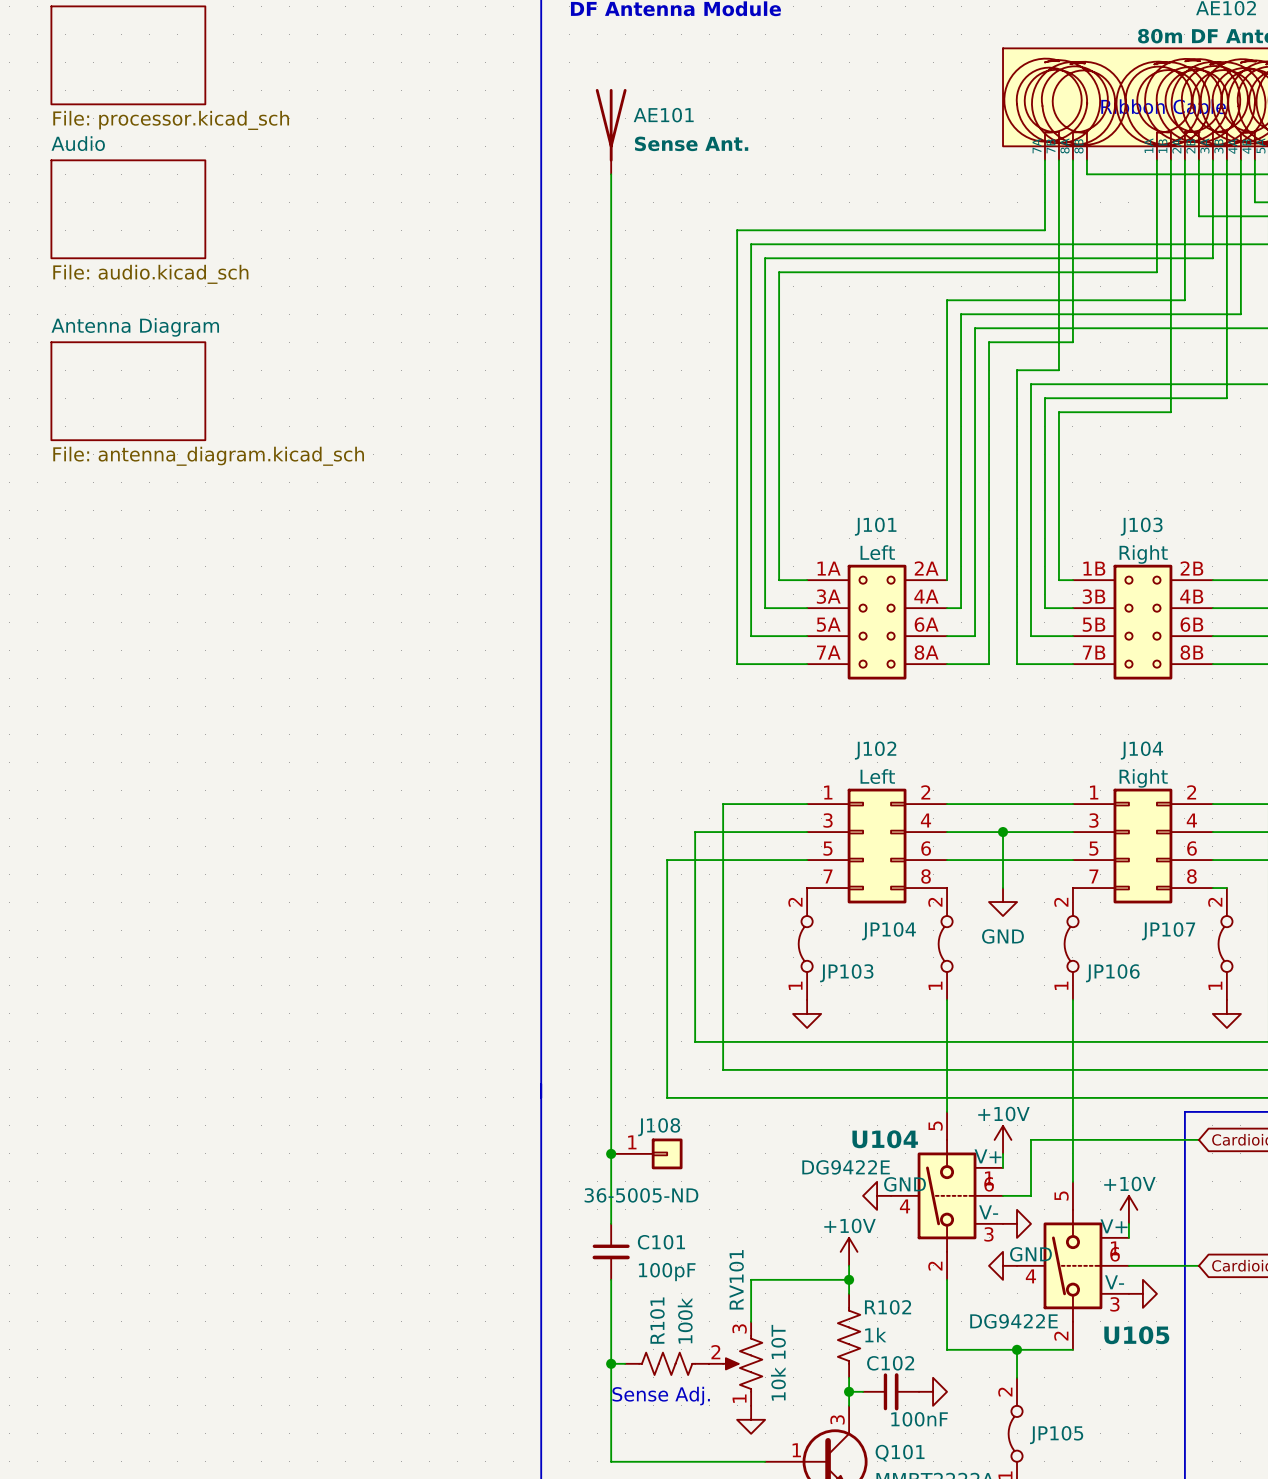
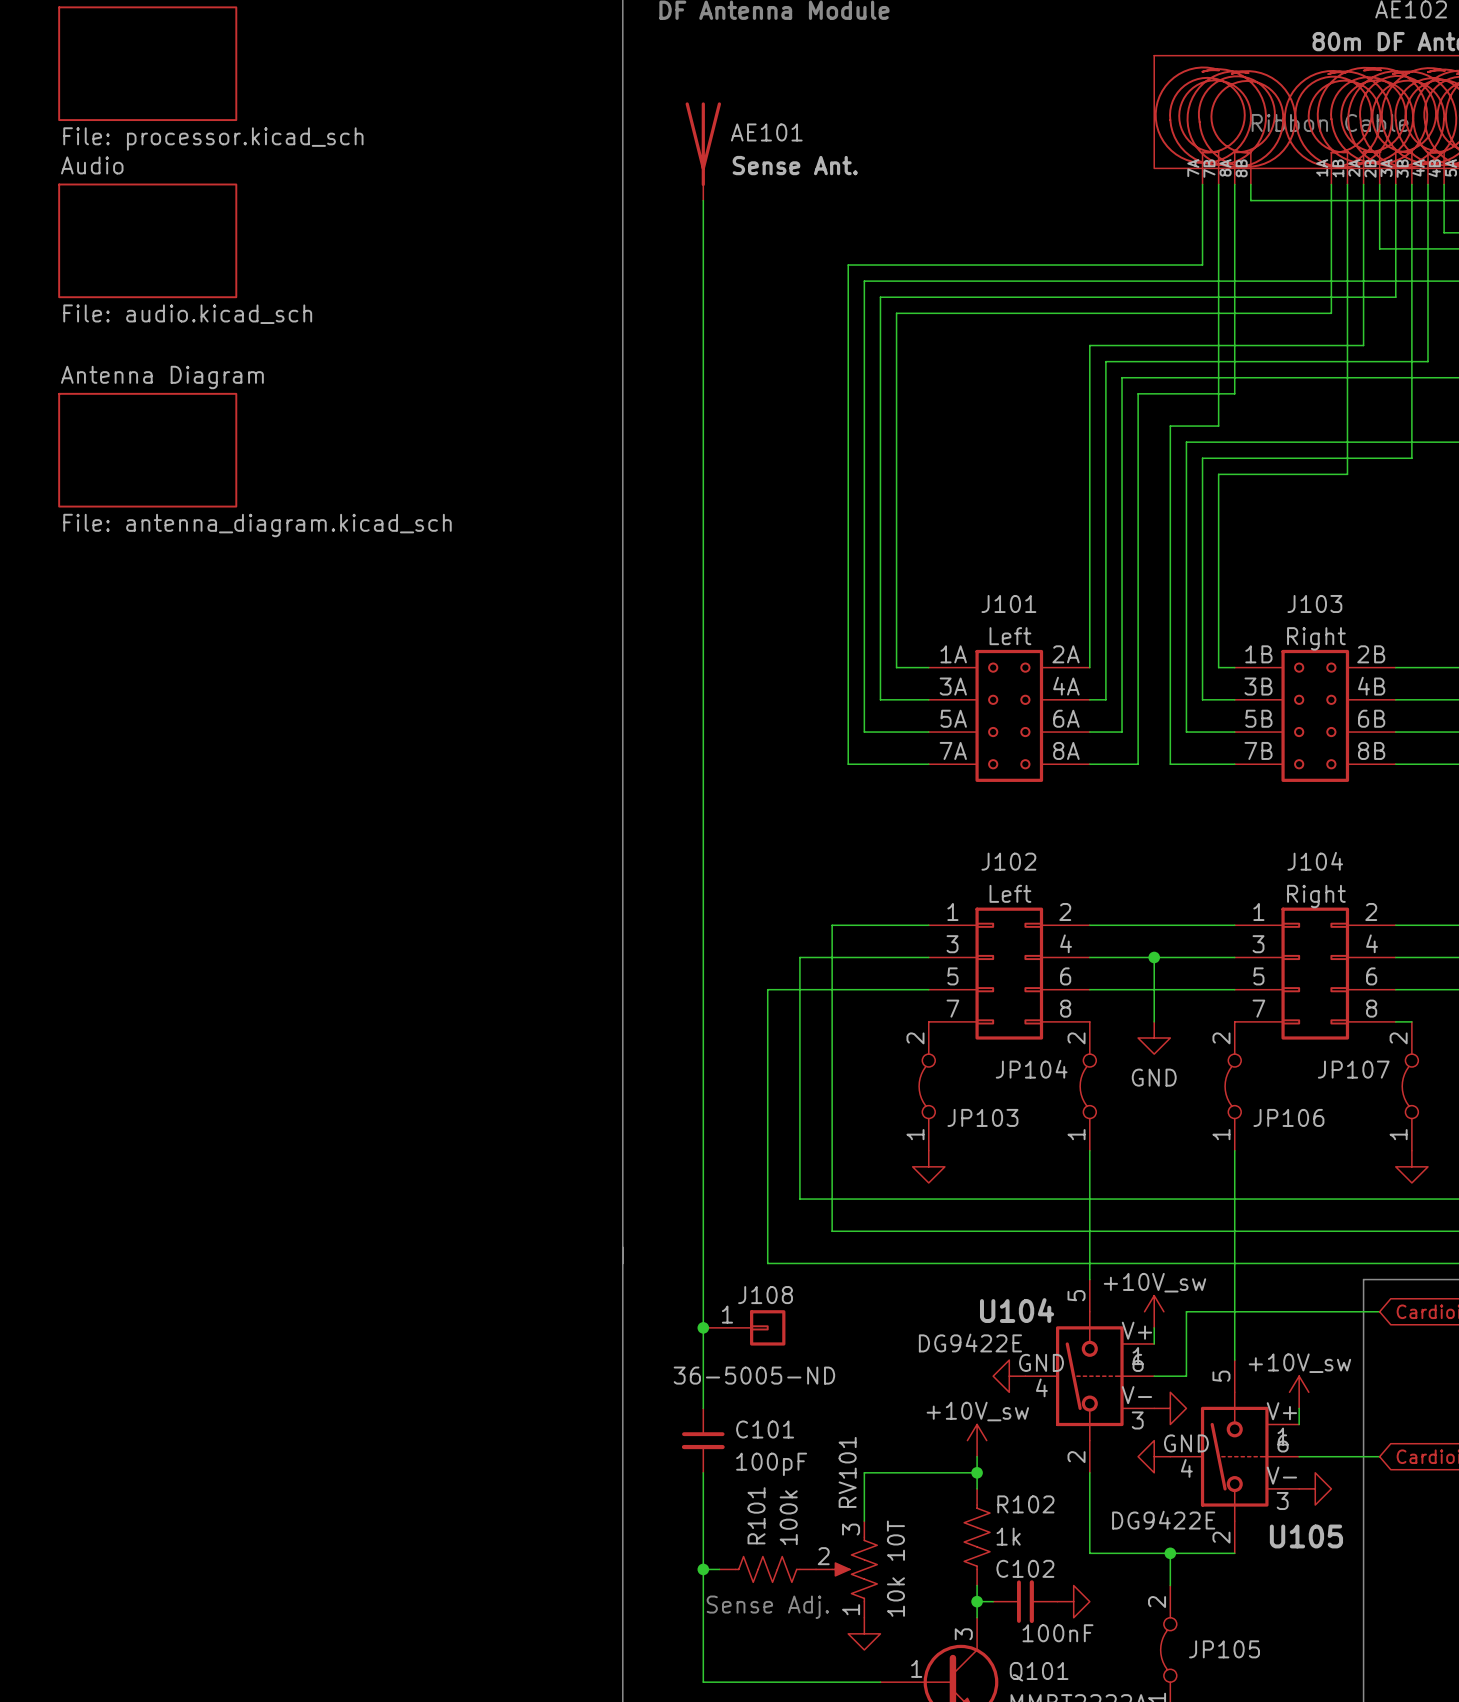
power symbol: +10V (1003, 1139) -> +10V_sw (1154, 1311)
power symbol: +10V (1128, 1209) -> +10V_sw (1299, 1392)
power symbol: +10V (849, 1251) -> +10V_sw (977, 1440)

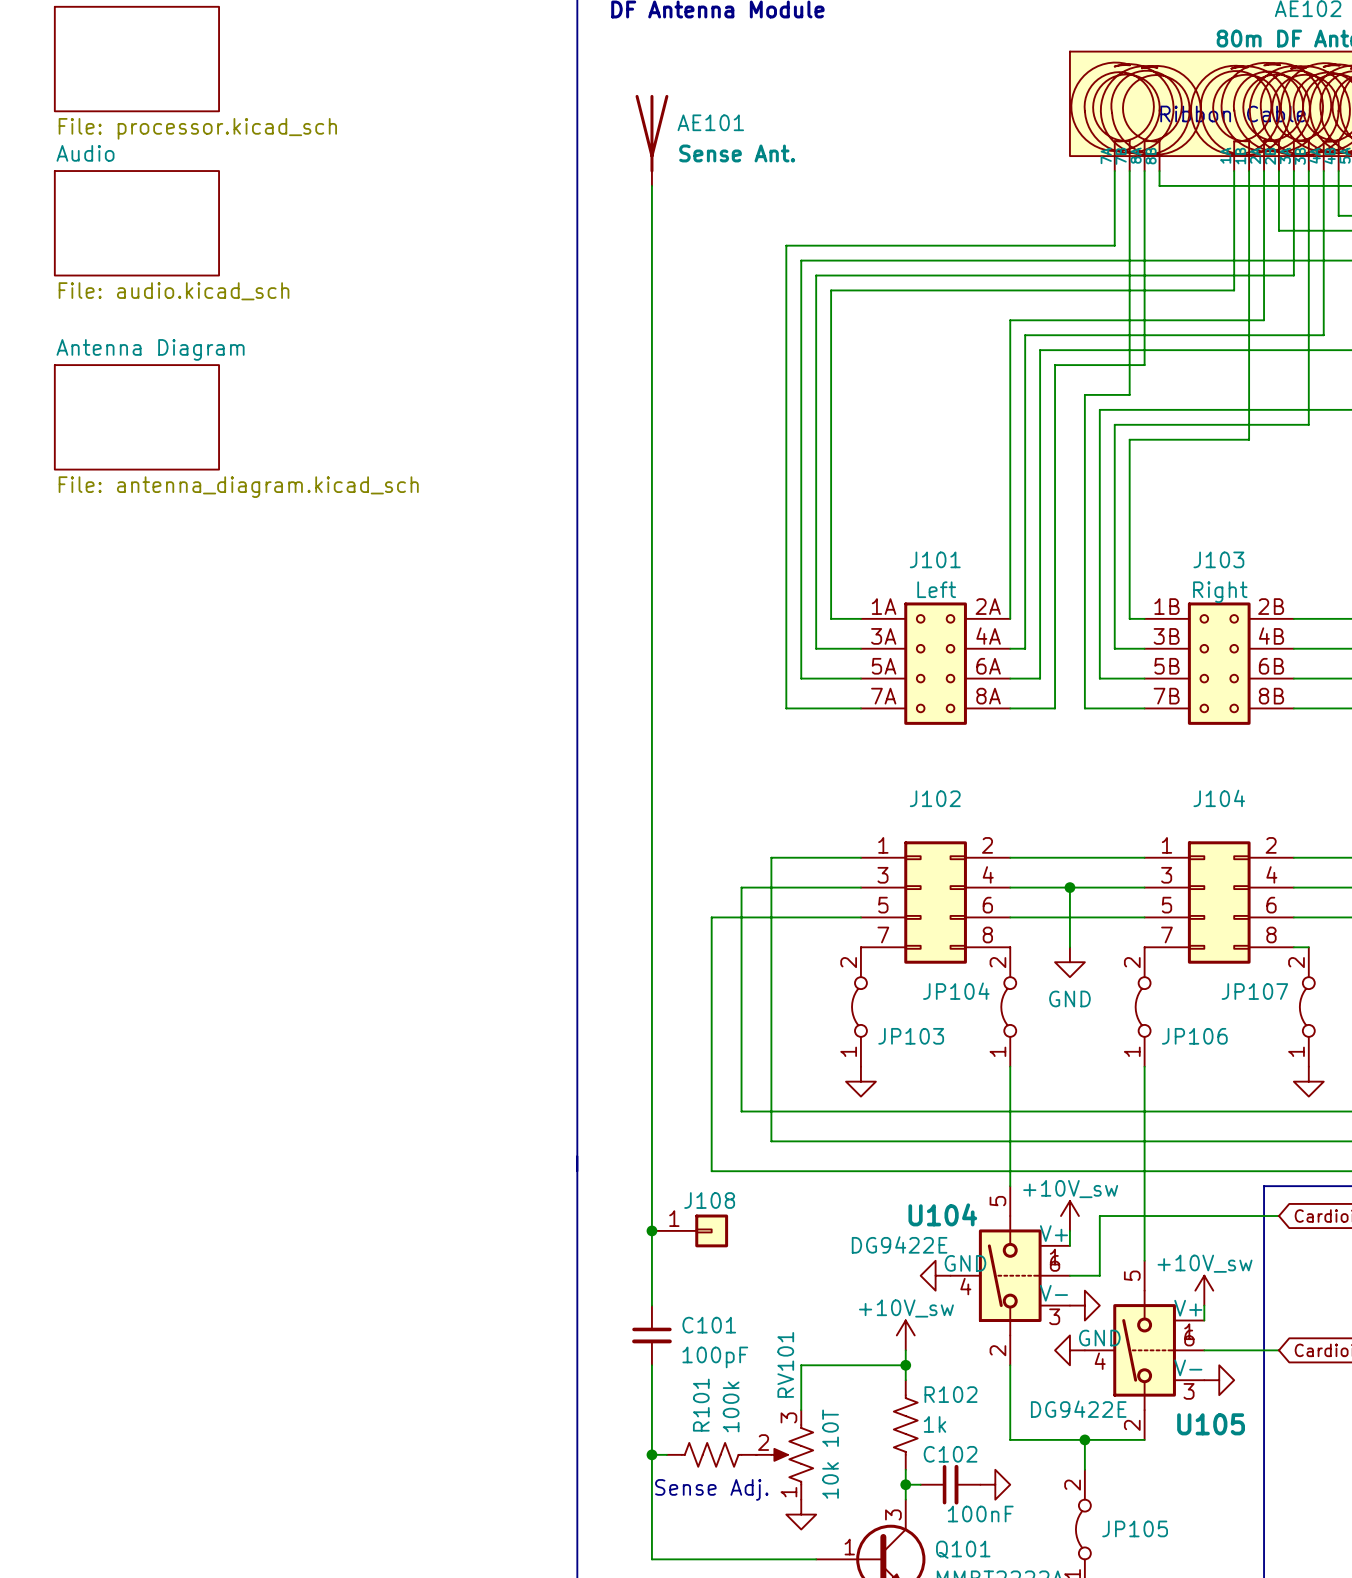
J102 value: Left (1010, 893) -> none
J104 value: Right (1316, 896) -> none
J108 value: 36-5005-ND (754, 1375) -> none

